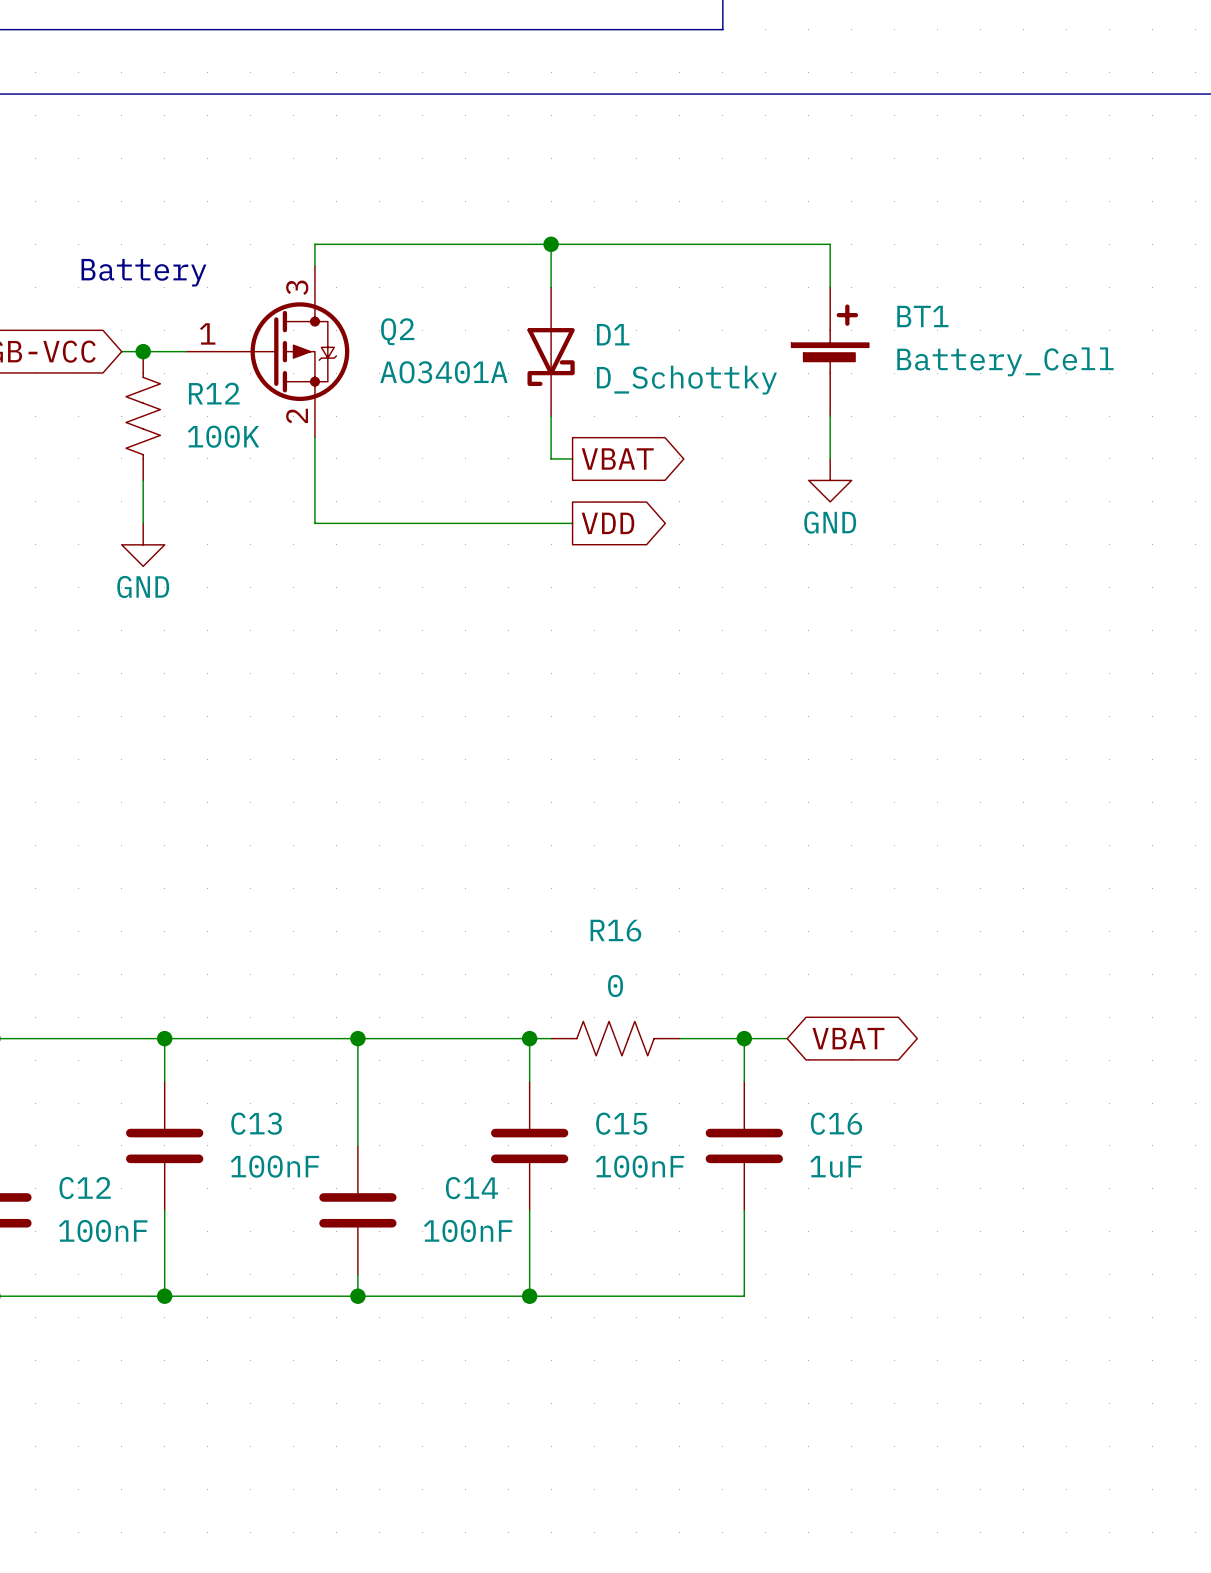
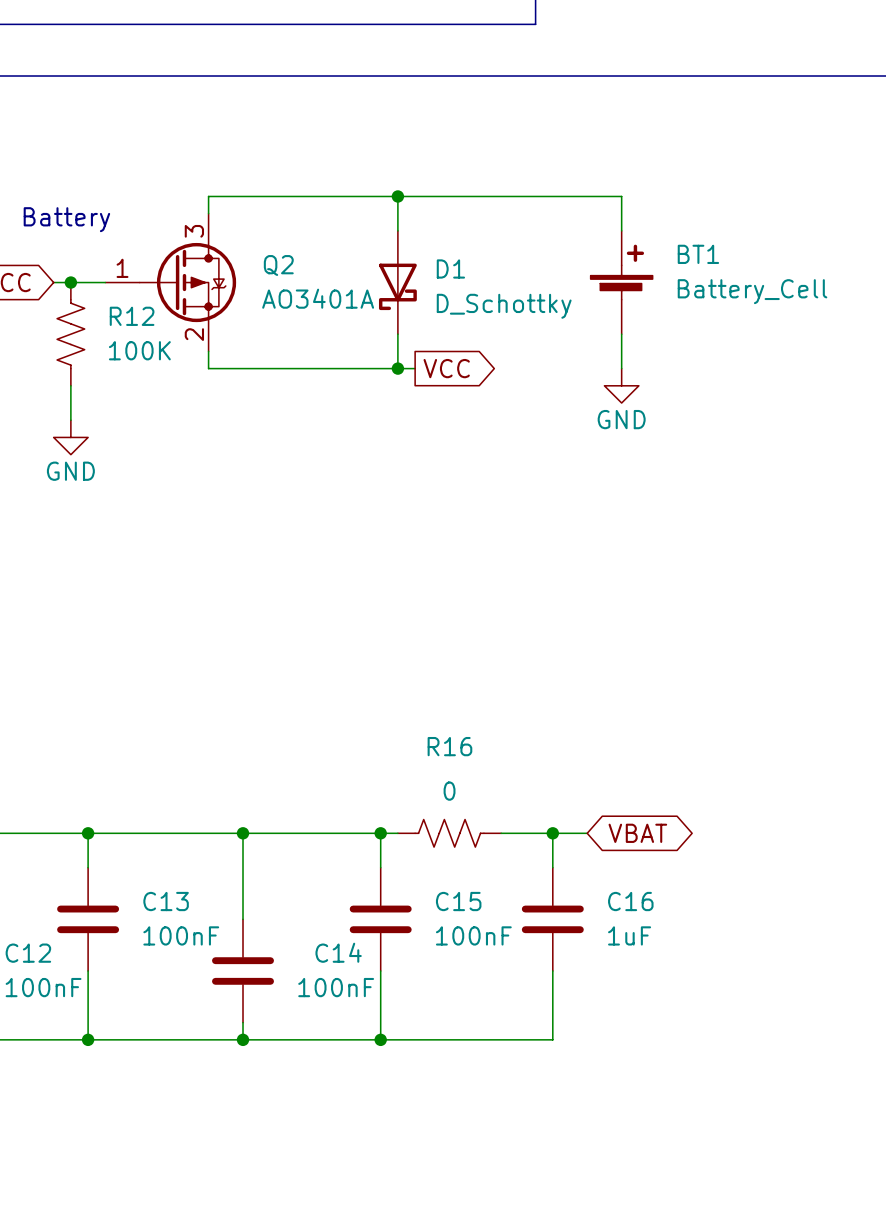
wire: (314, 458) (314, 523) (572, 523) -> (208, 368) (397, 368)
junction: none -> (397, 368)
global label: VBAT (617, 458) -> VCC (446, 368)
global label: VDD (607, 523) -> none

